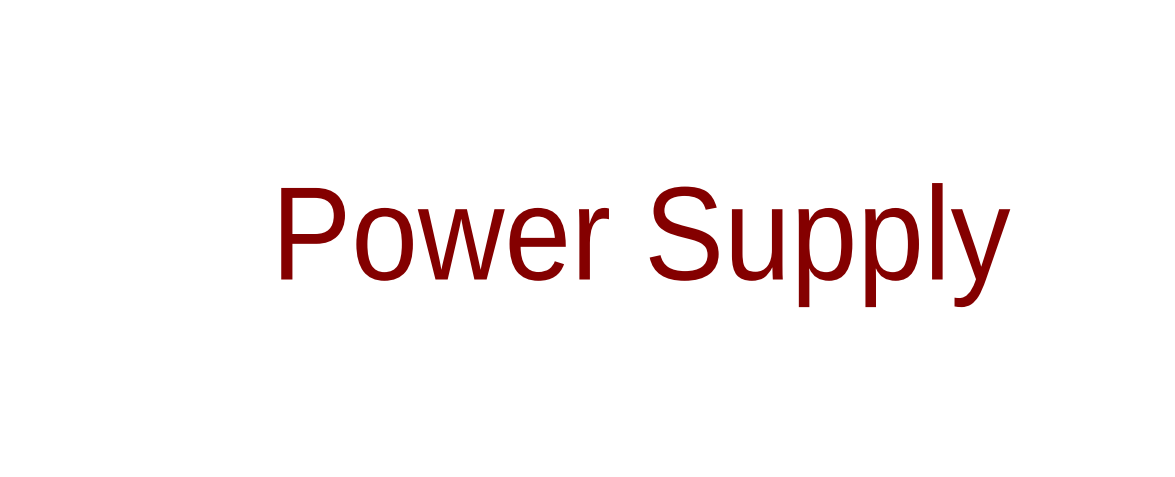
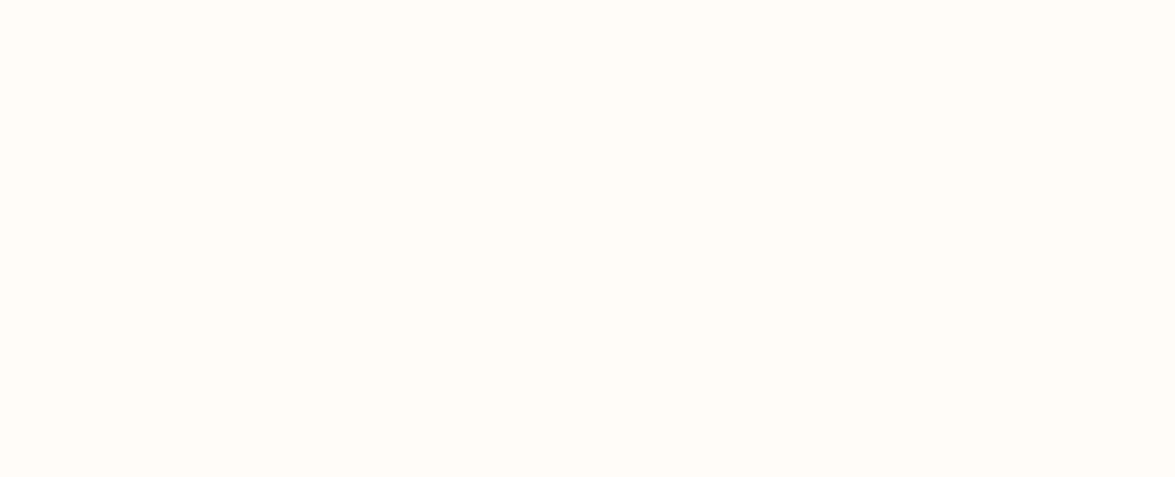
text: Power Supply (645, 245) -> none

